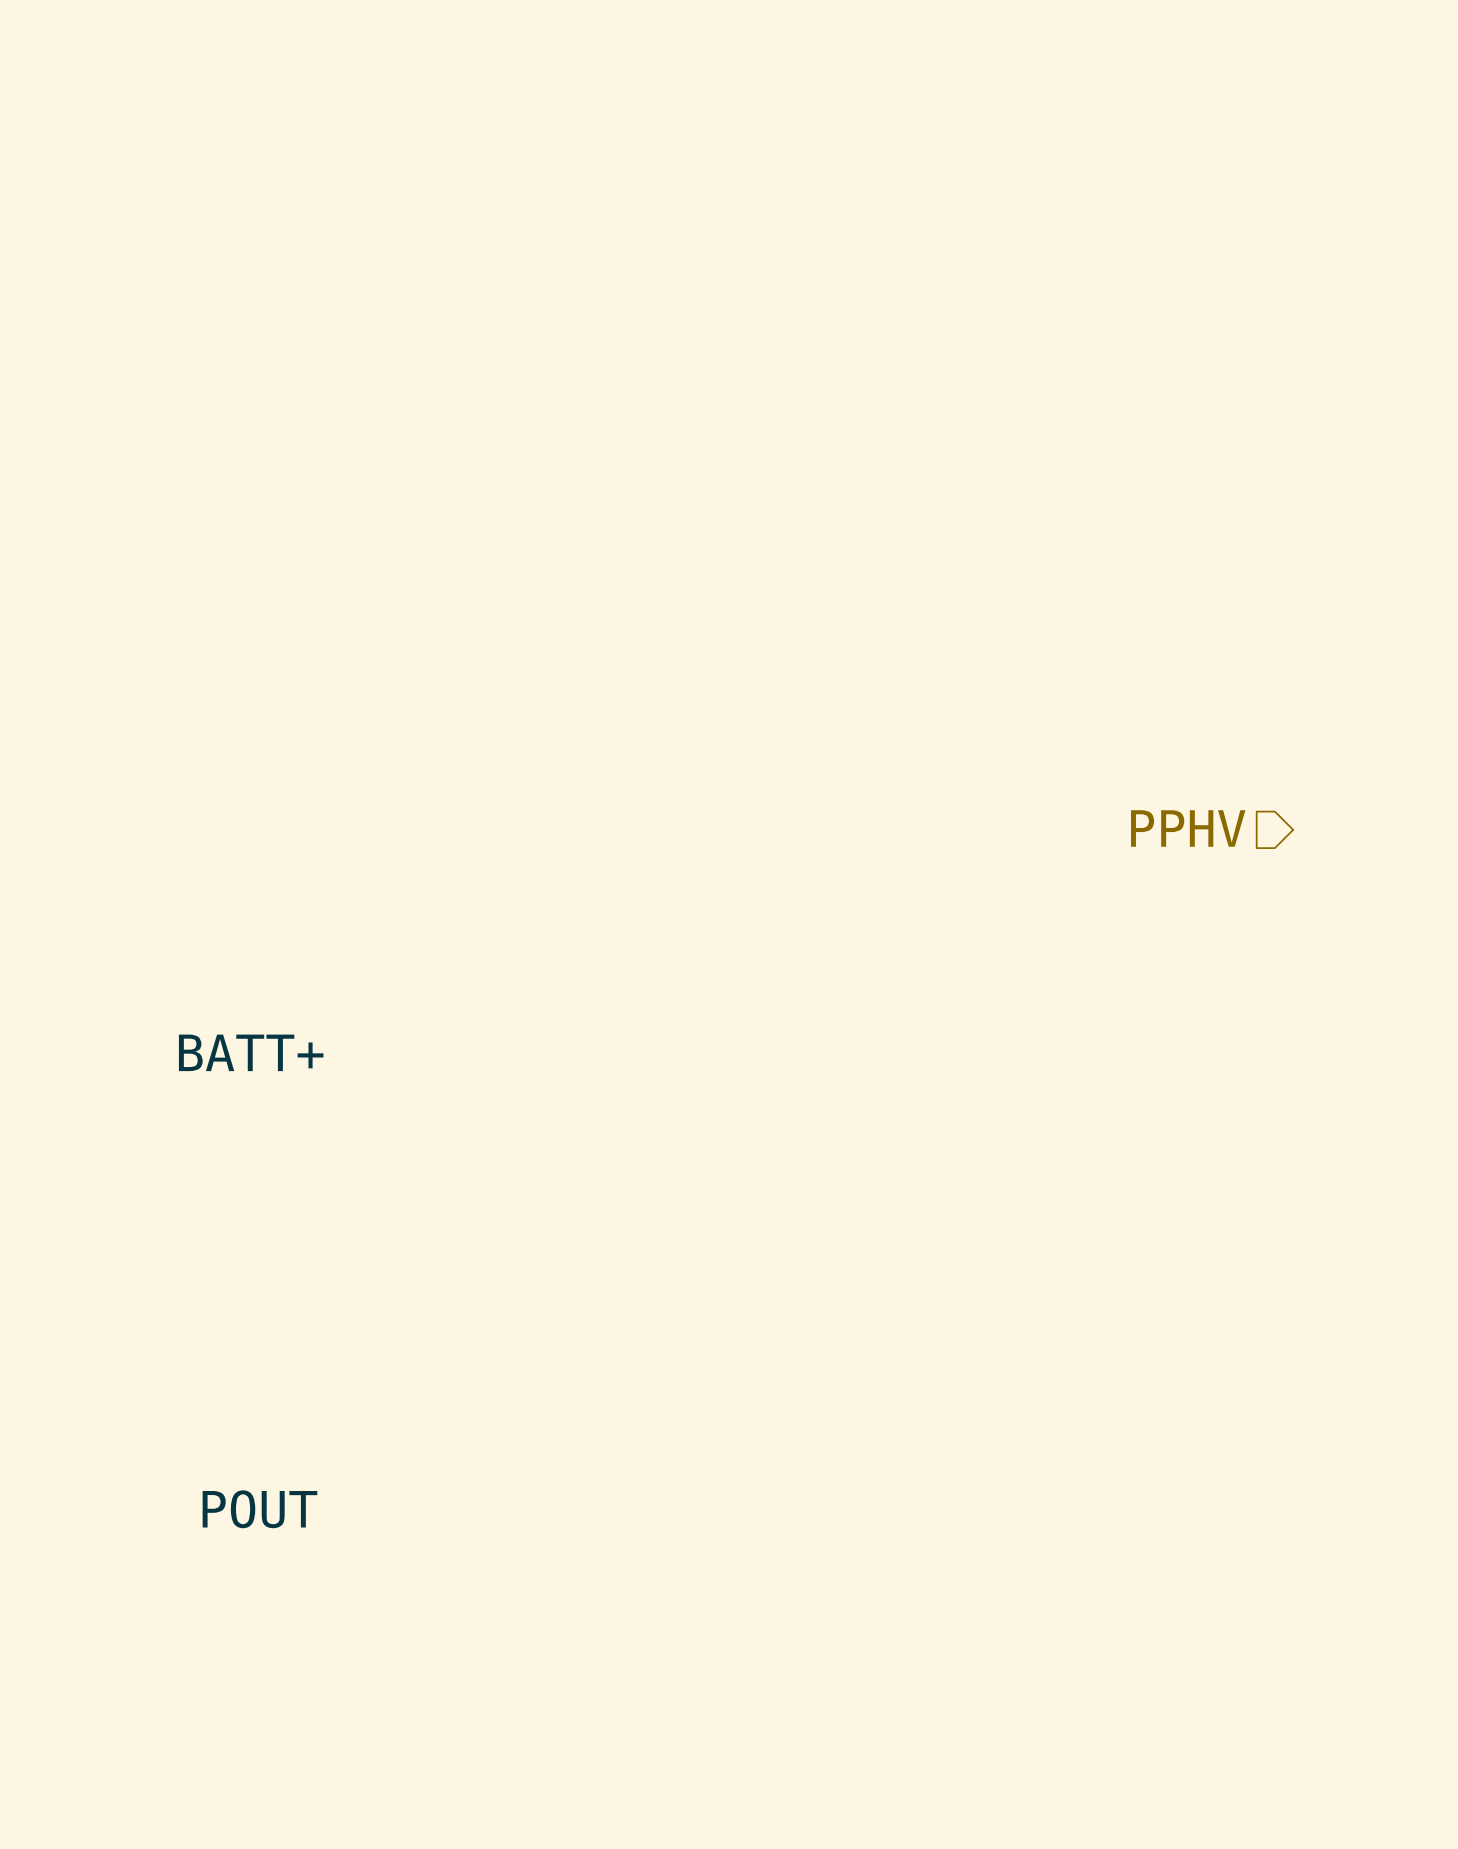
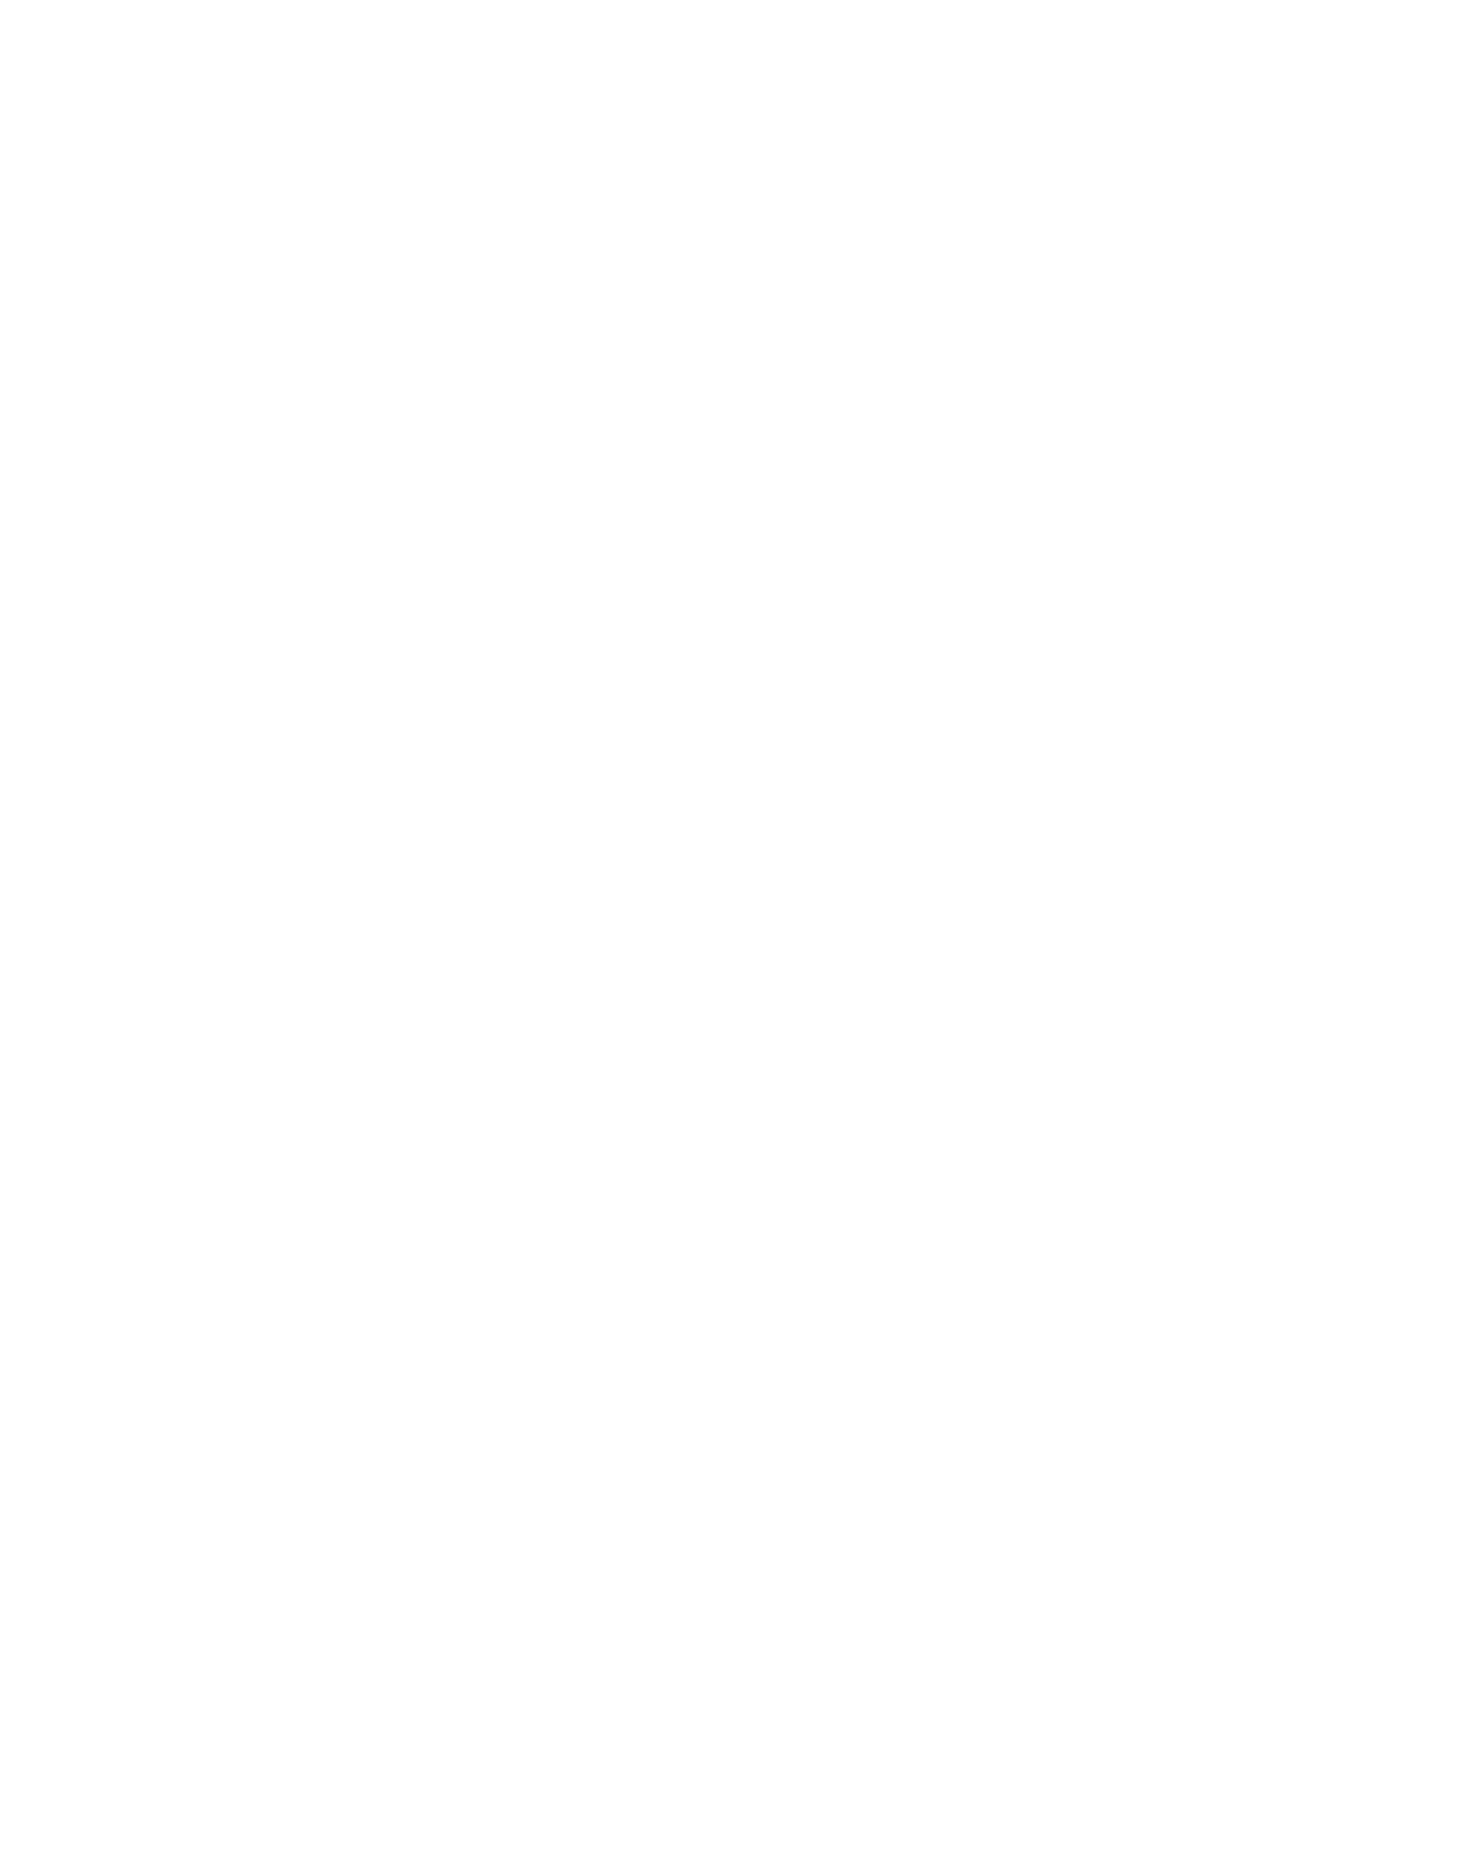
hierarchical label: PPHV (1188, 828) -> none
label: BATT+ (251, 1052) -> none
label: POUT (259, 1509) -> none

